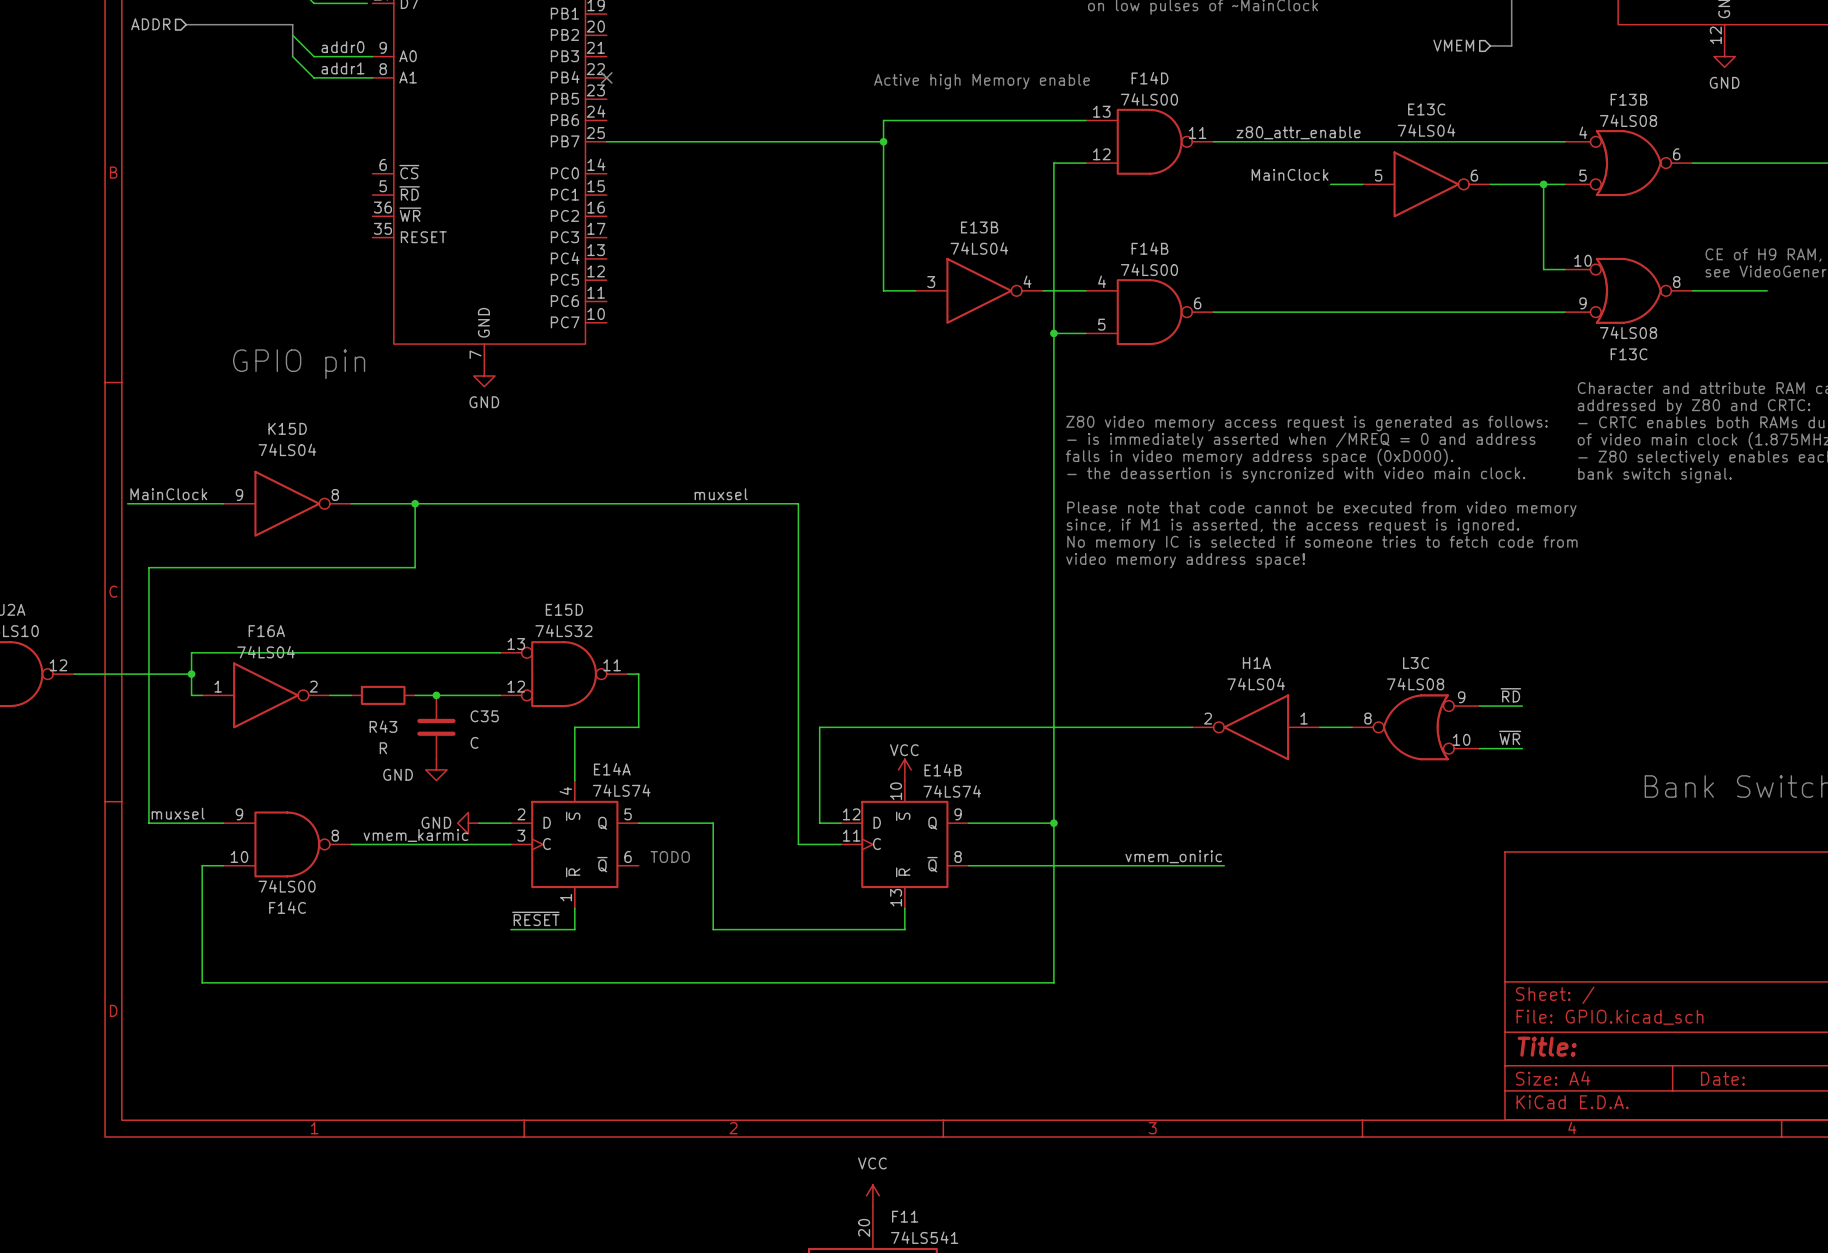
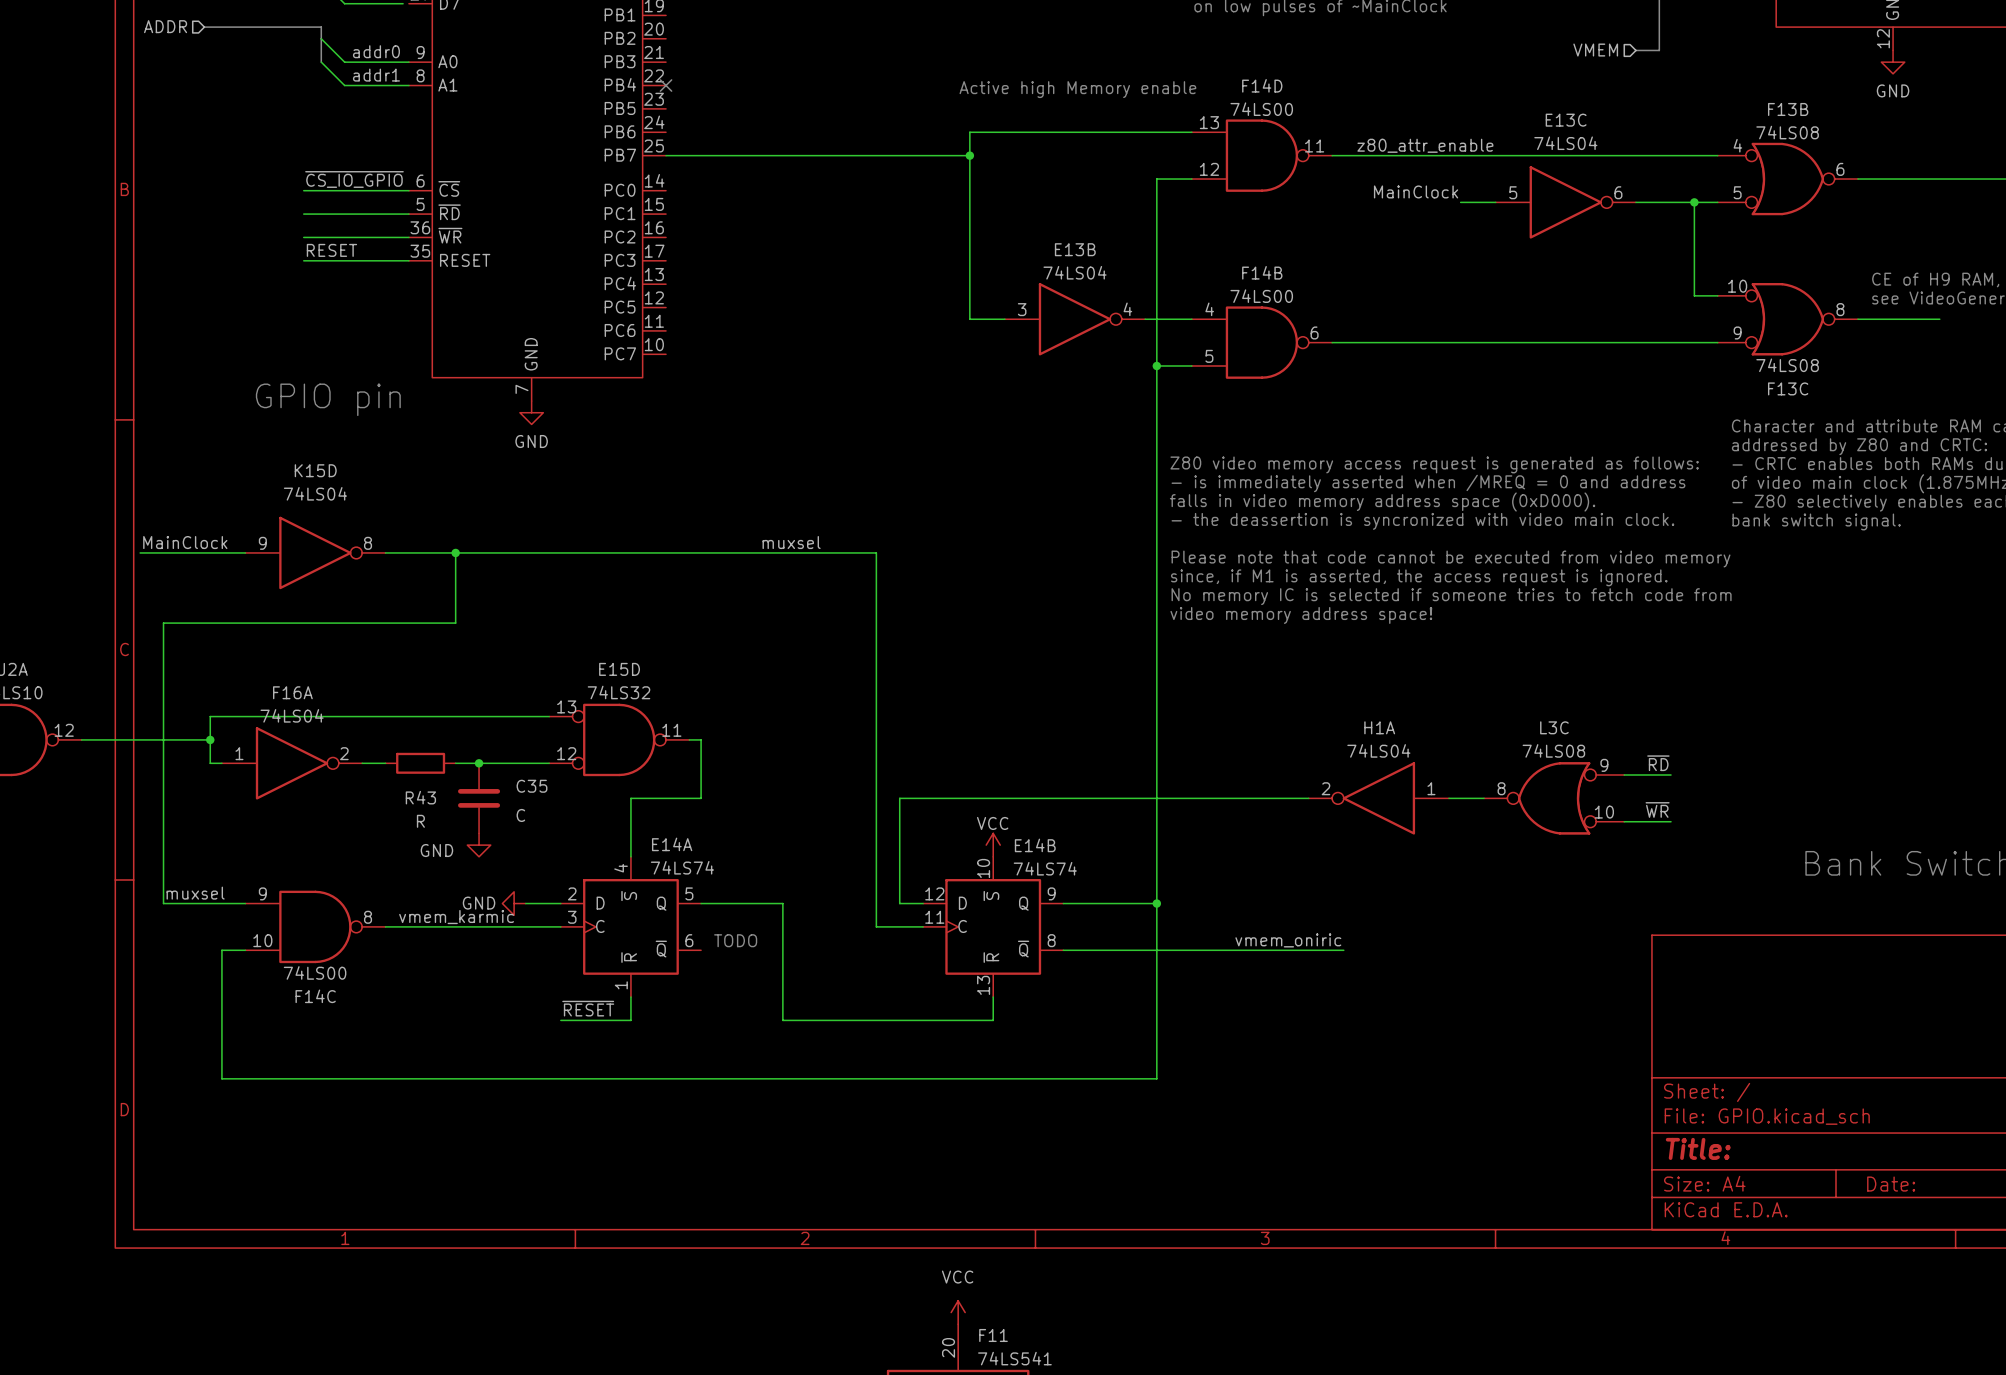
label: none -> ~{CS_IO_GPIO} (354, 179)
wire: none -> (303, 190) (408, 190)
wire: none -> (303, 214) (408, 214)
wire: none -> (303, 237) (408, 237)
label: none -> RESET (331, 250)
wire: none -> (303, 260) (408, 260)

